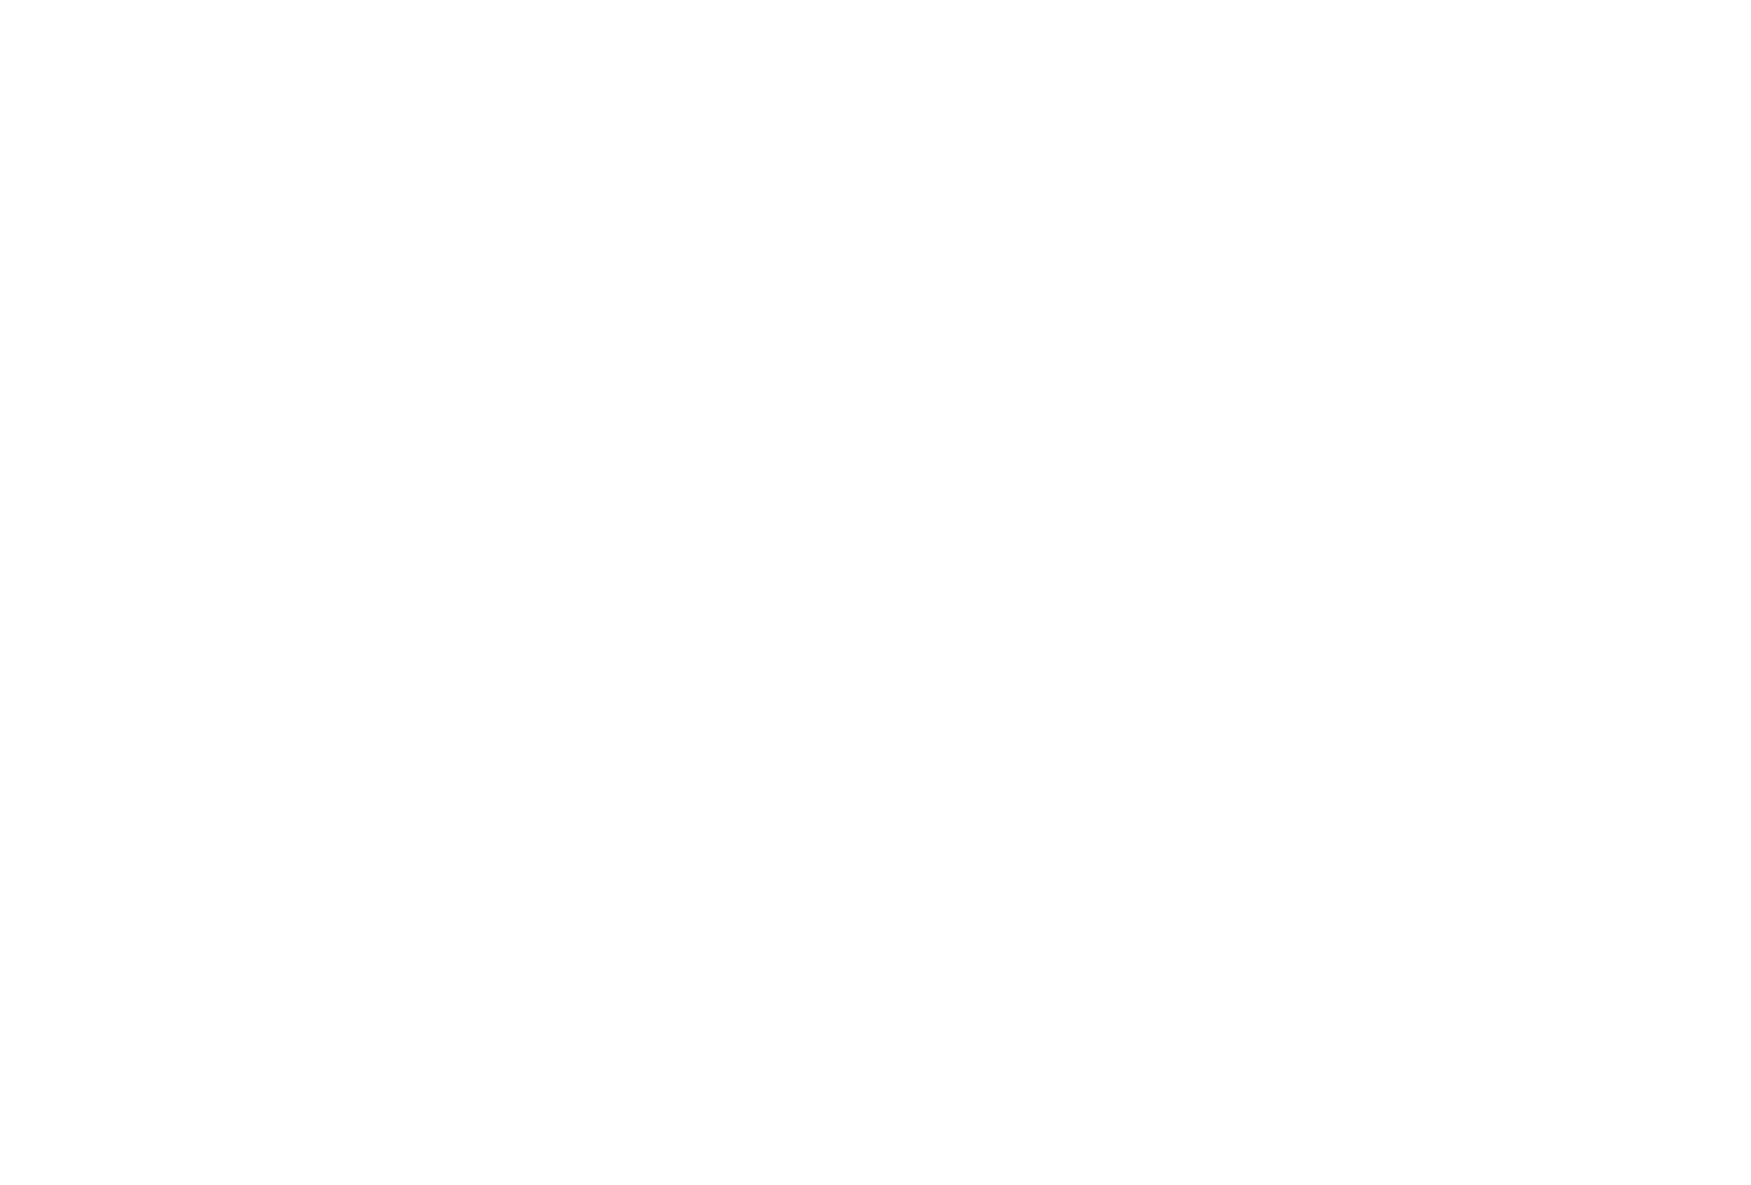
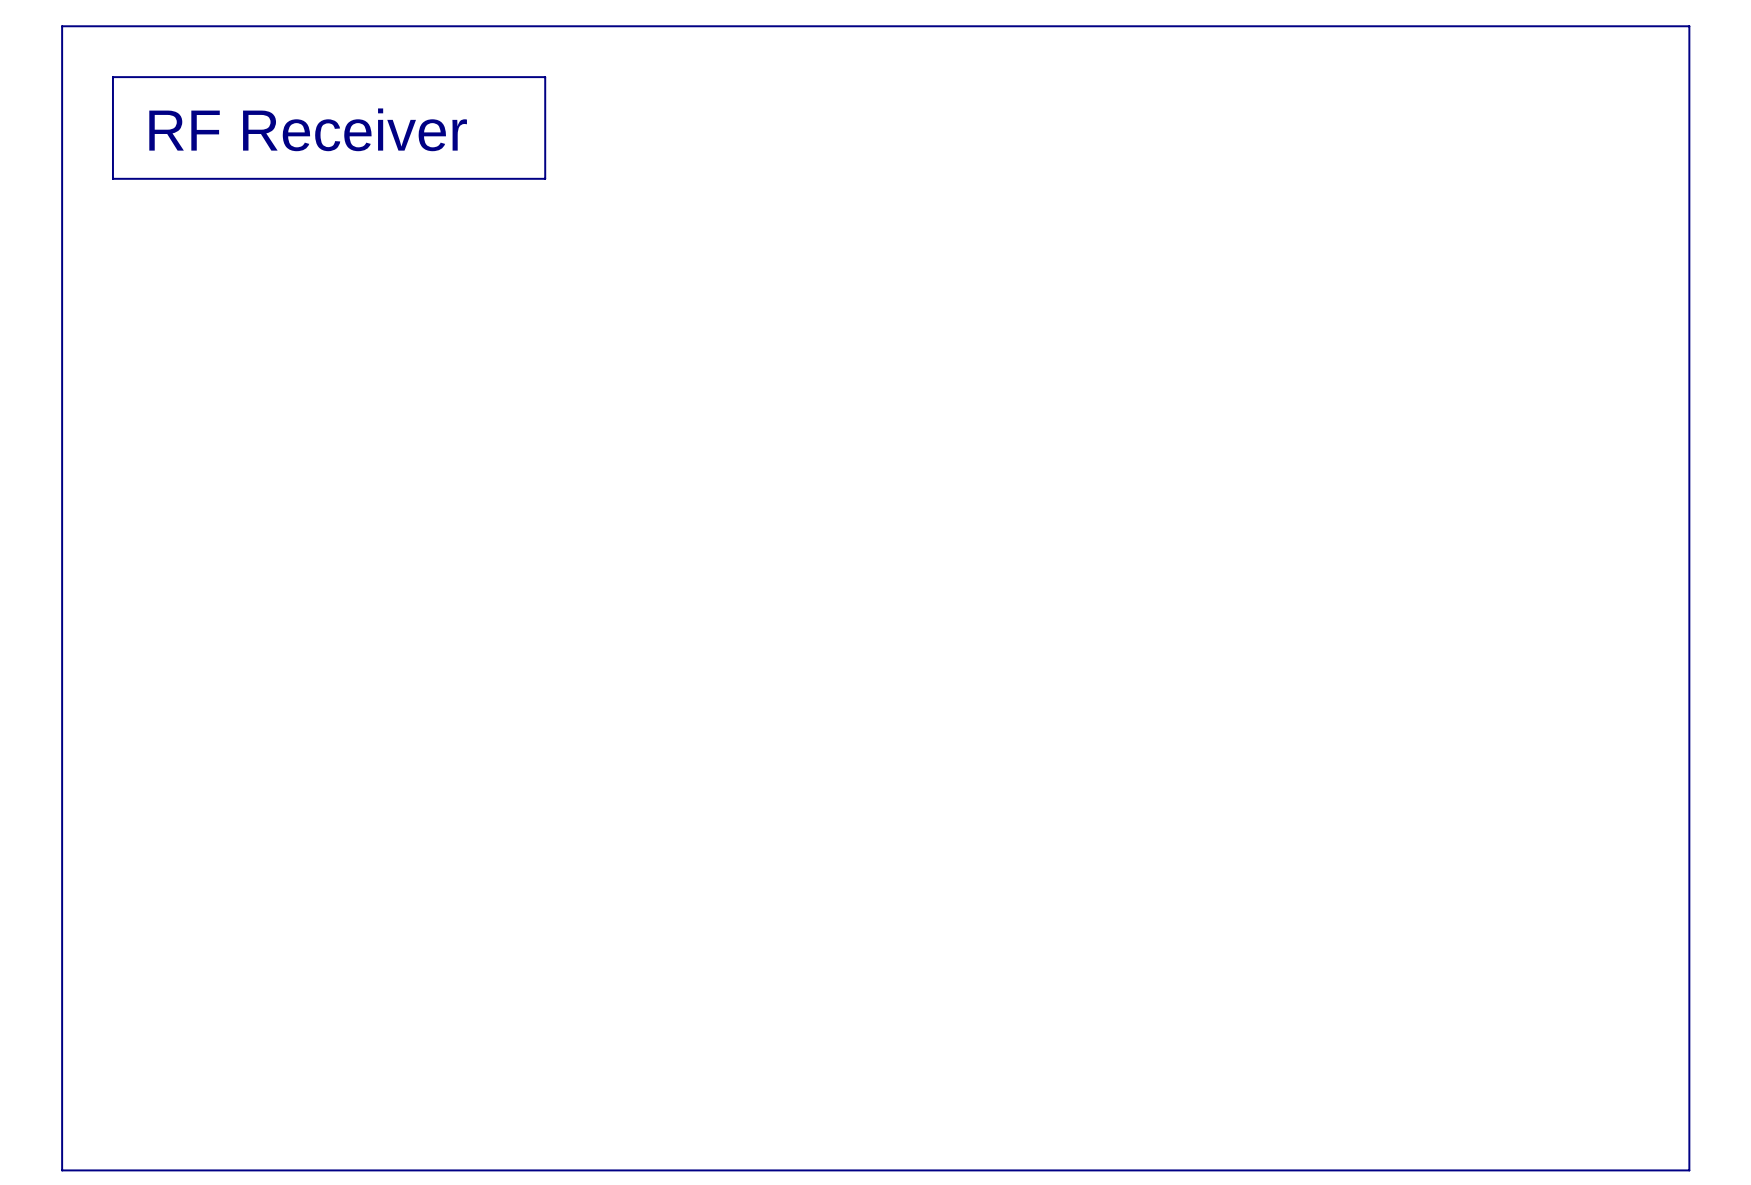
line: none -> (62, 26) (1689, 26) (1689, 1170) (62, 1170) (62, 26)
line: none -> (112, 77) (545, 77) (545, 178) (112, 178) (112, 77)
text: none -> RF Receiver (308, 129)

